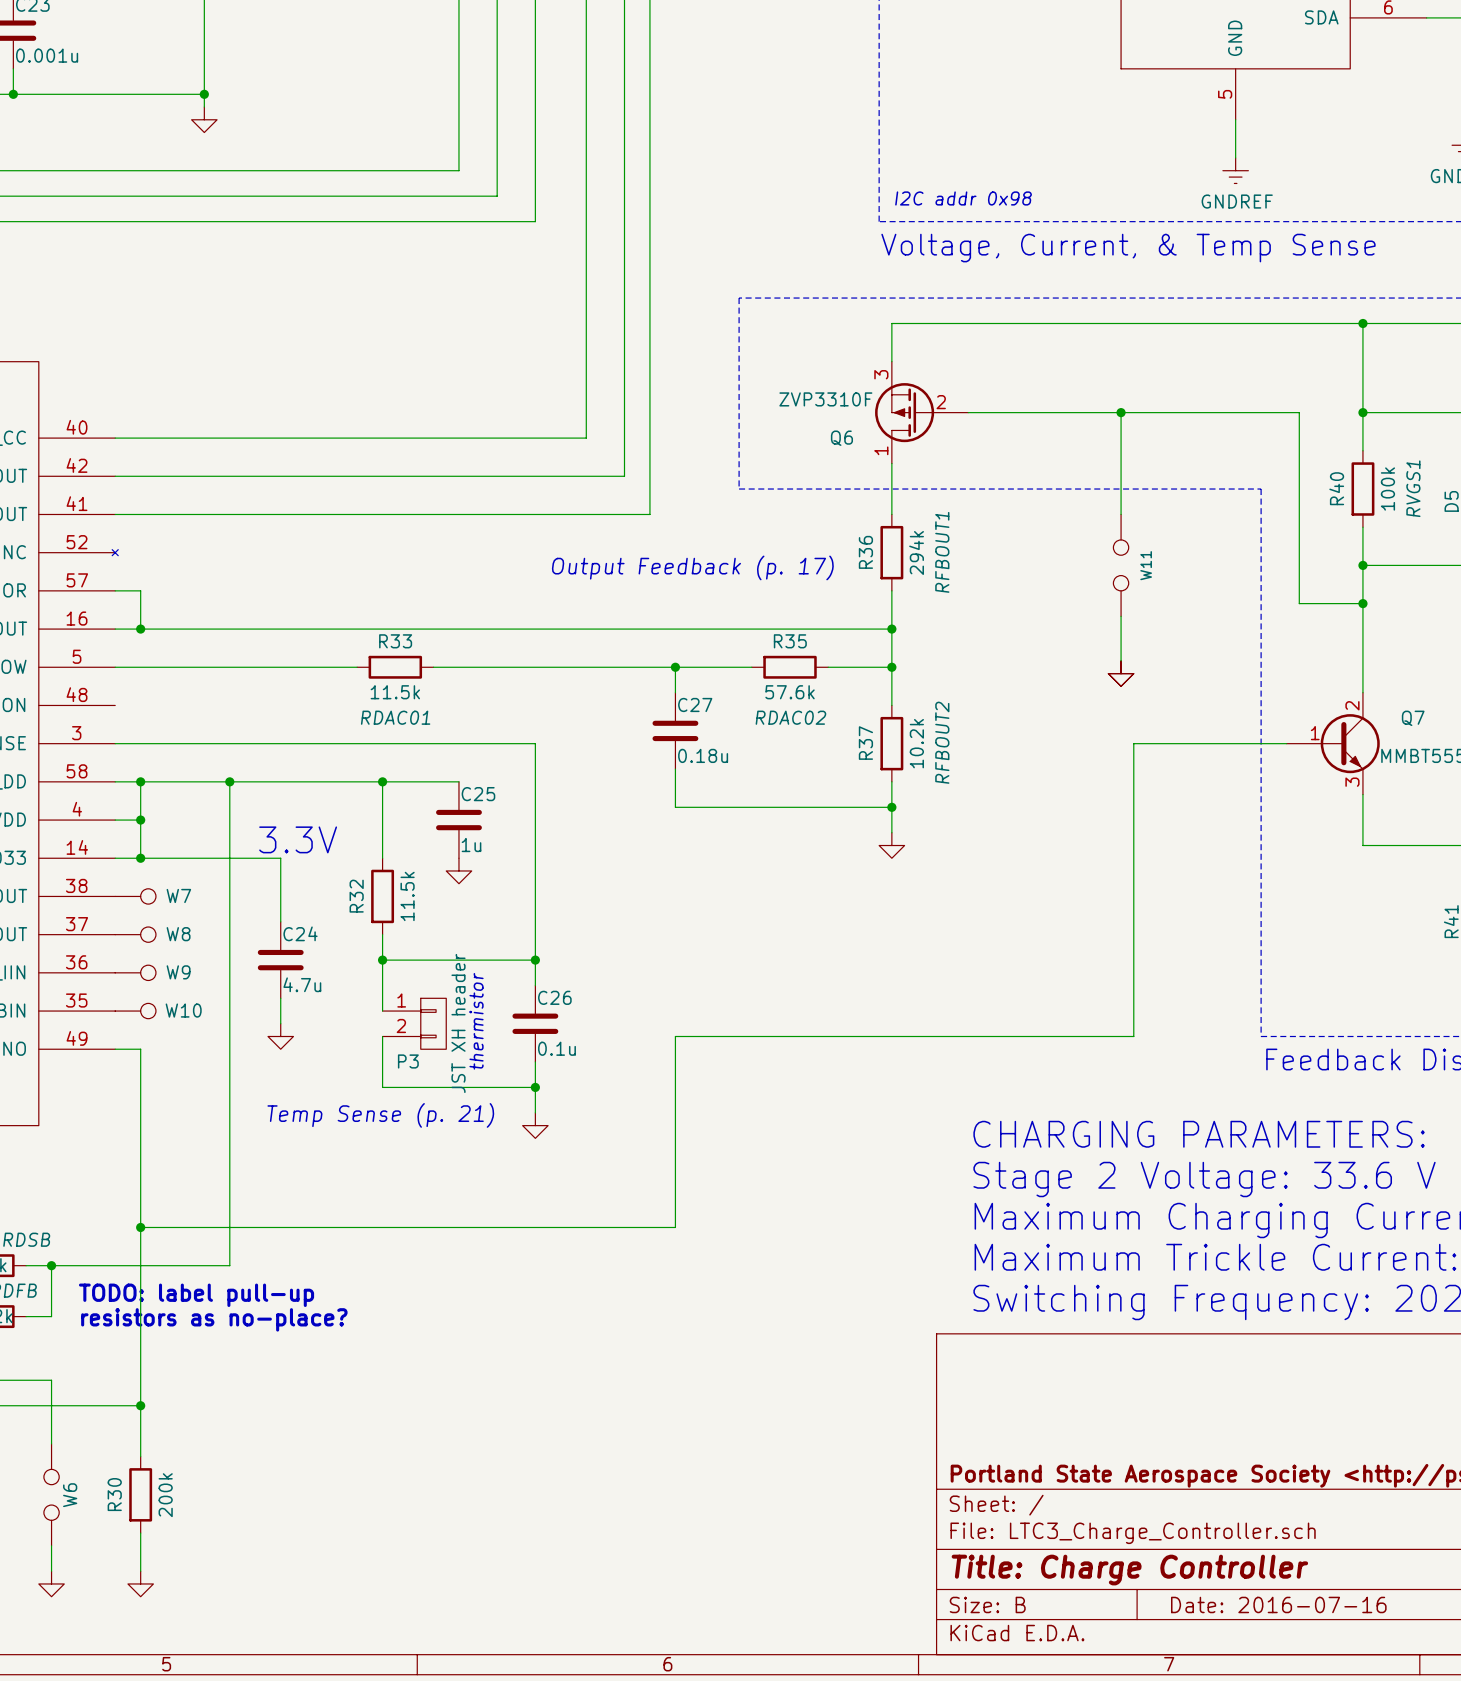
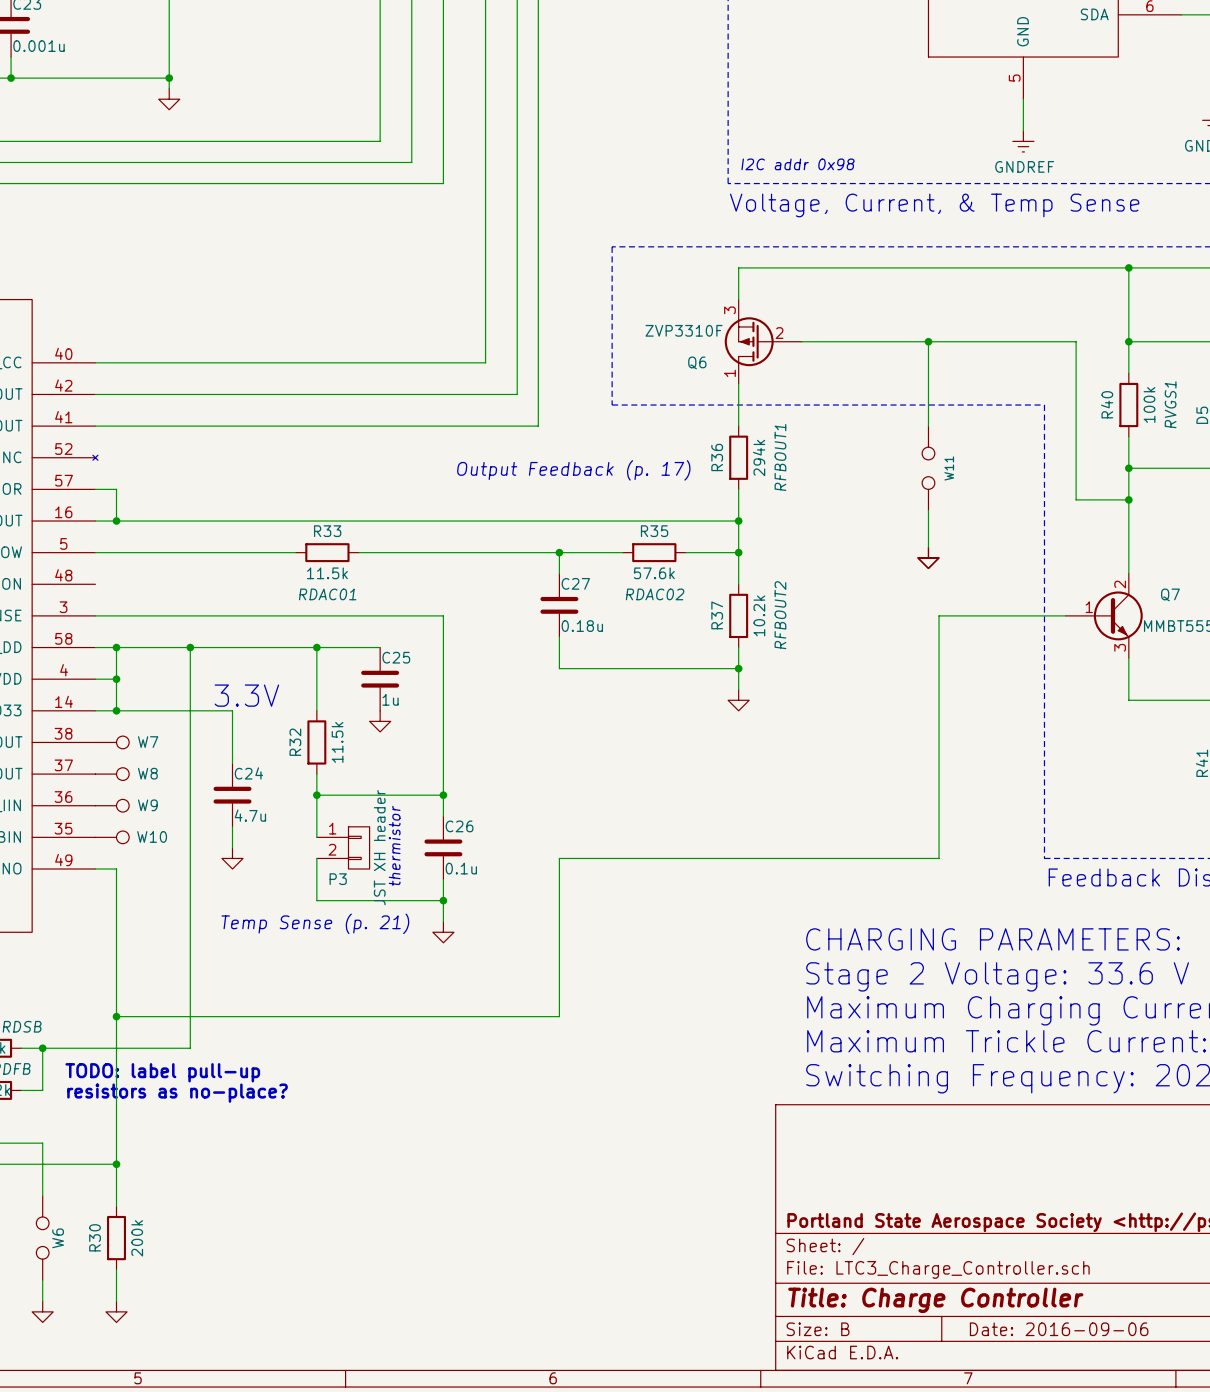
title block: Date: 2016-07-16 (1278, 1604) -> Date: 2016-09-06 (1059, 1329)

